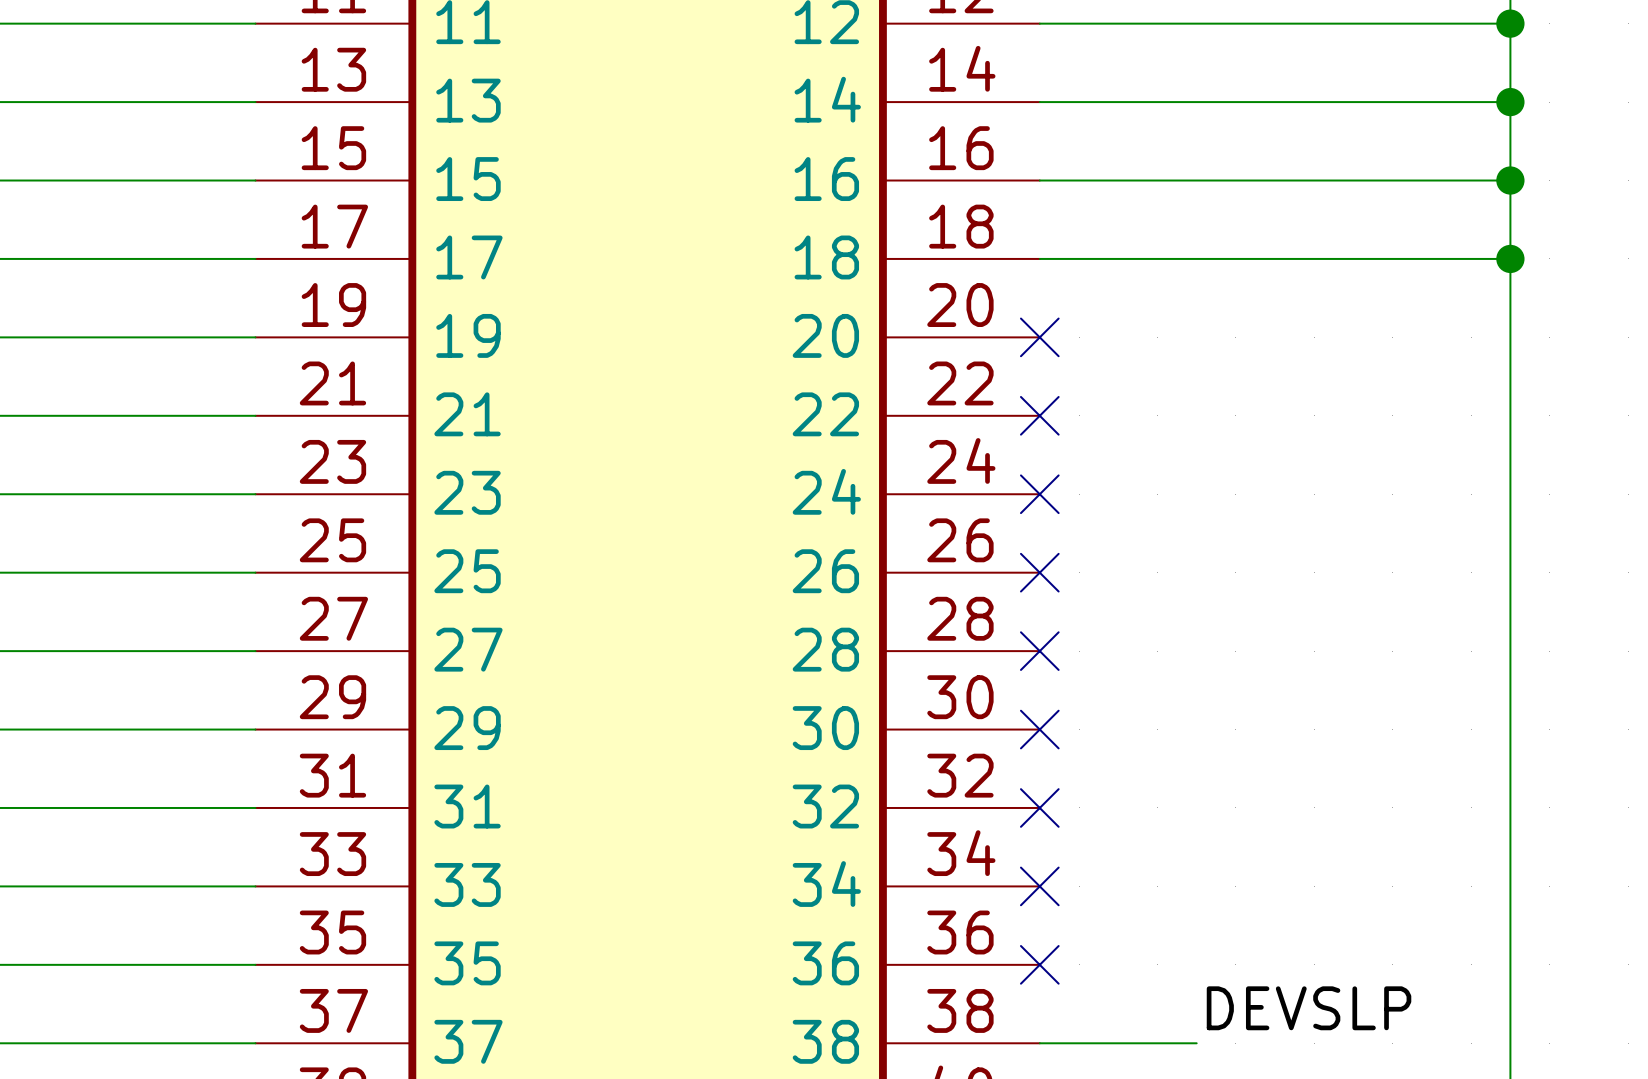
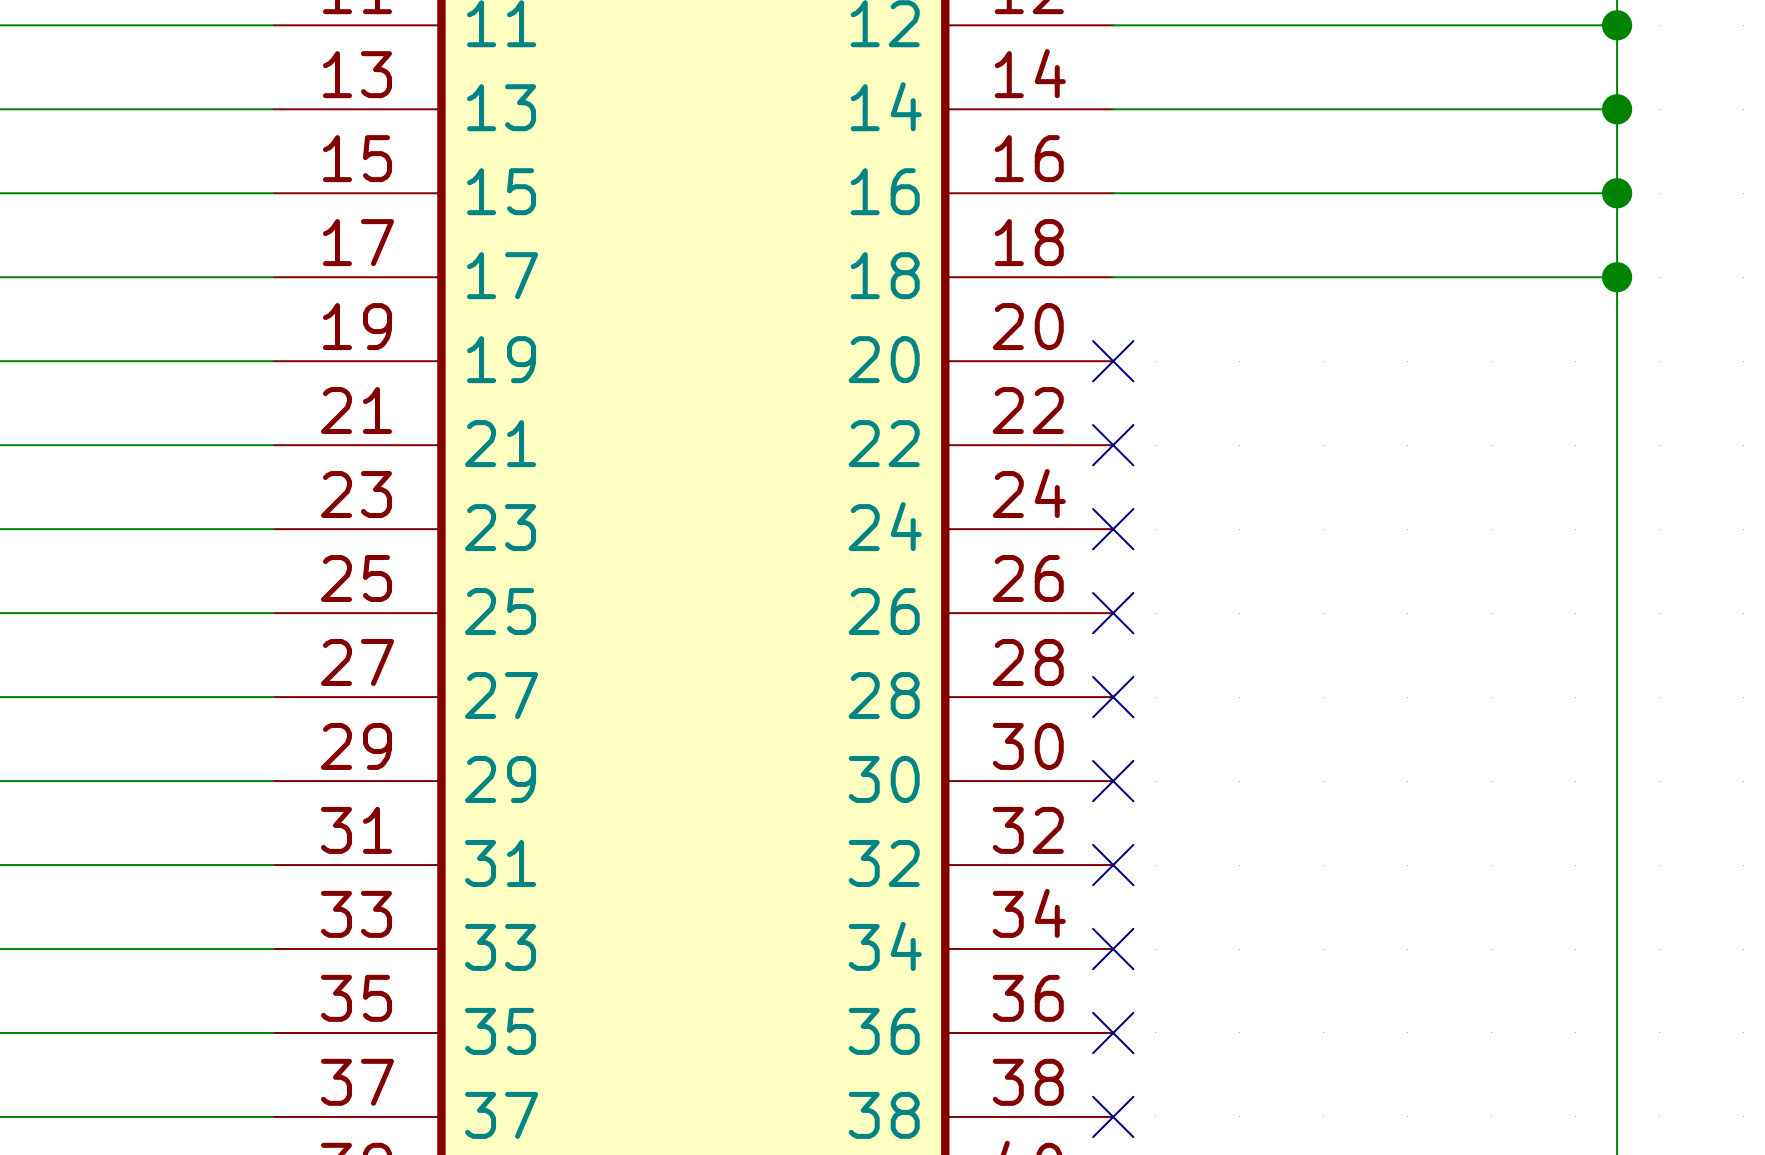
label: DEVSLP (1309, 1008) -> none
wire: (1039, 1043) (1196, 1043) -> none
no-connect mark: none -> (1113, 1116)

